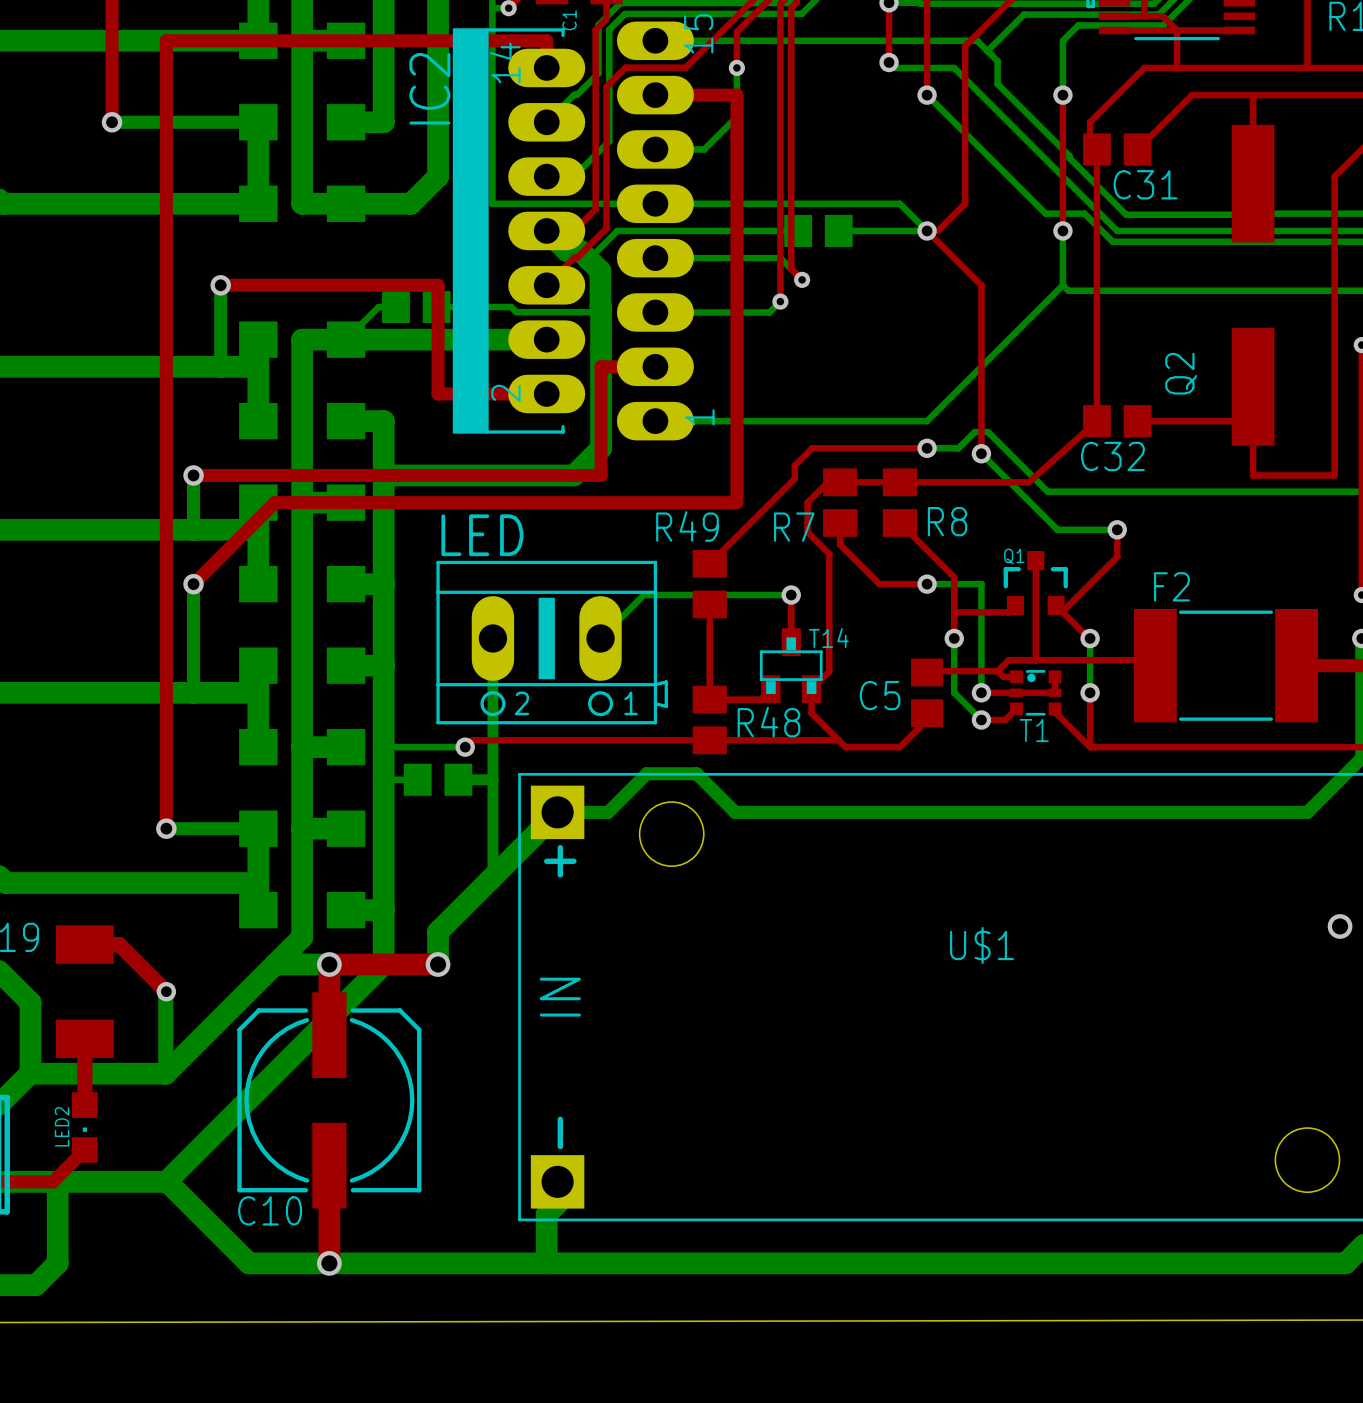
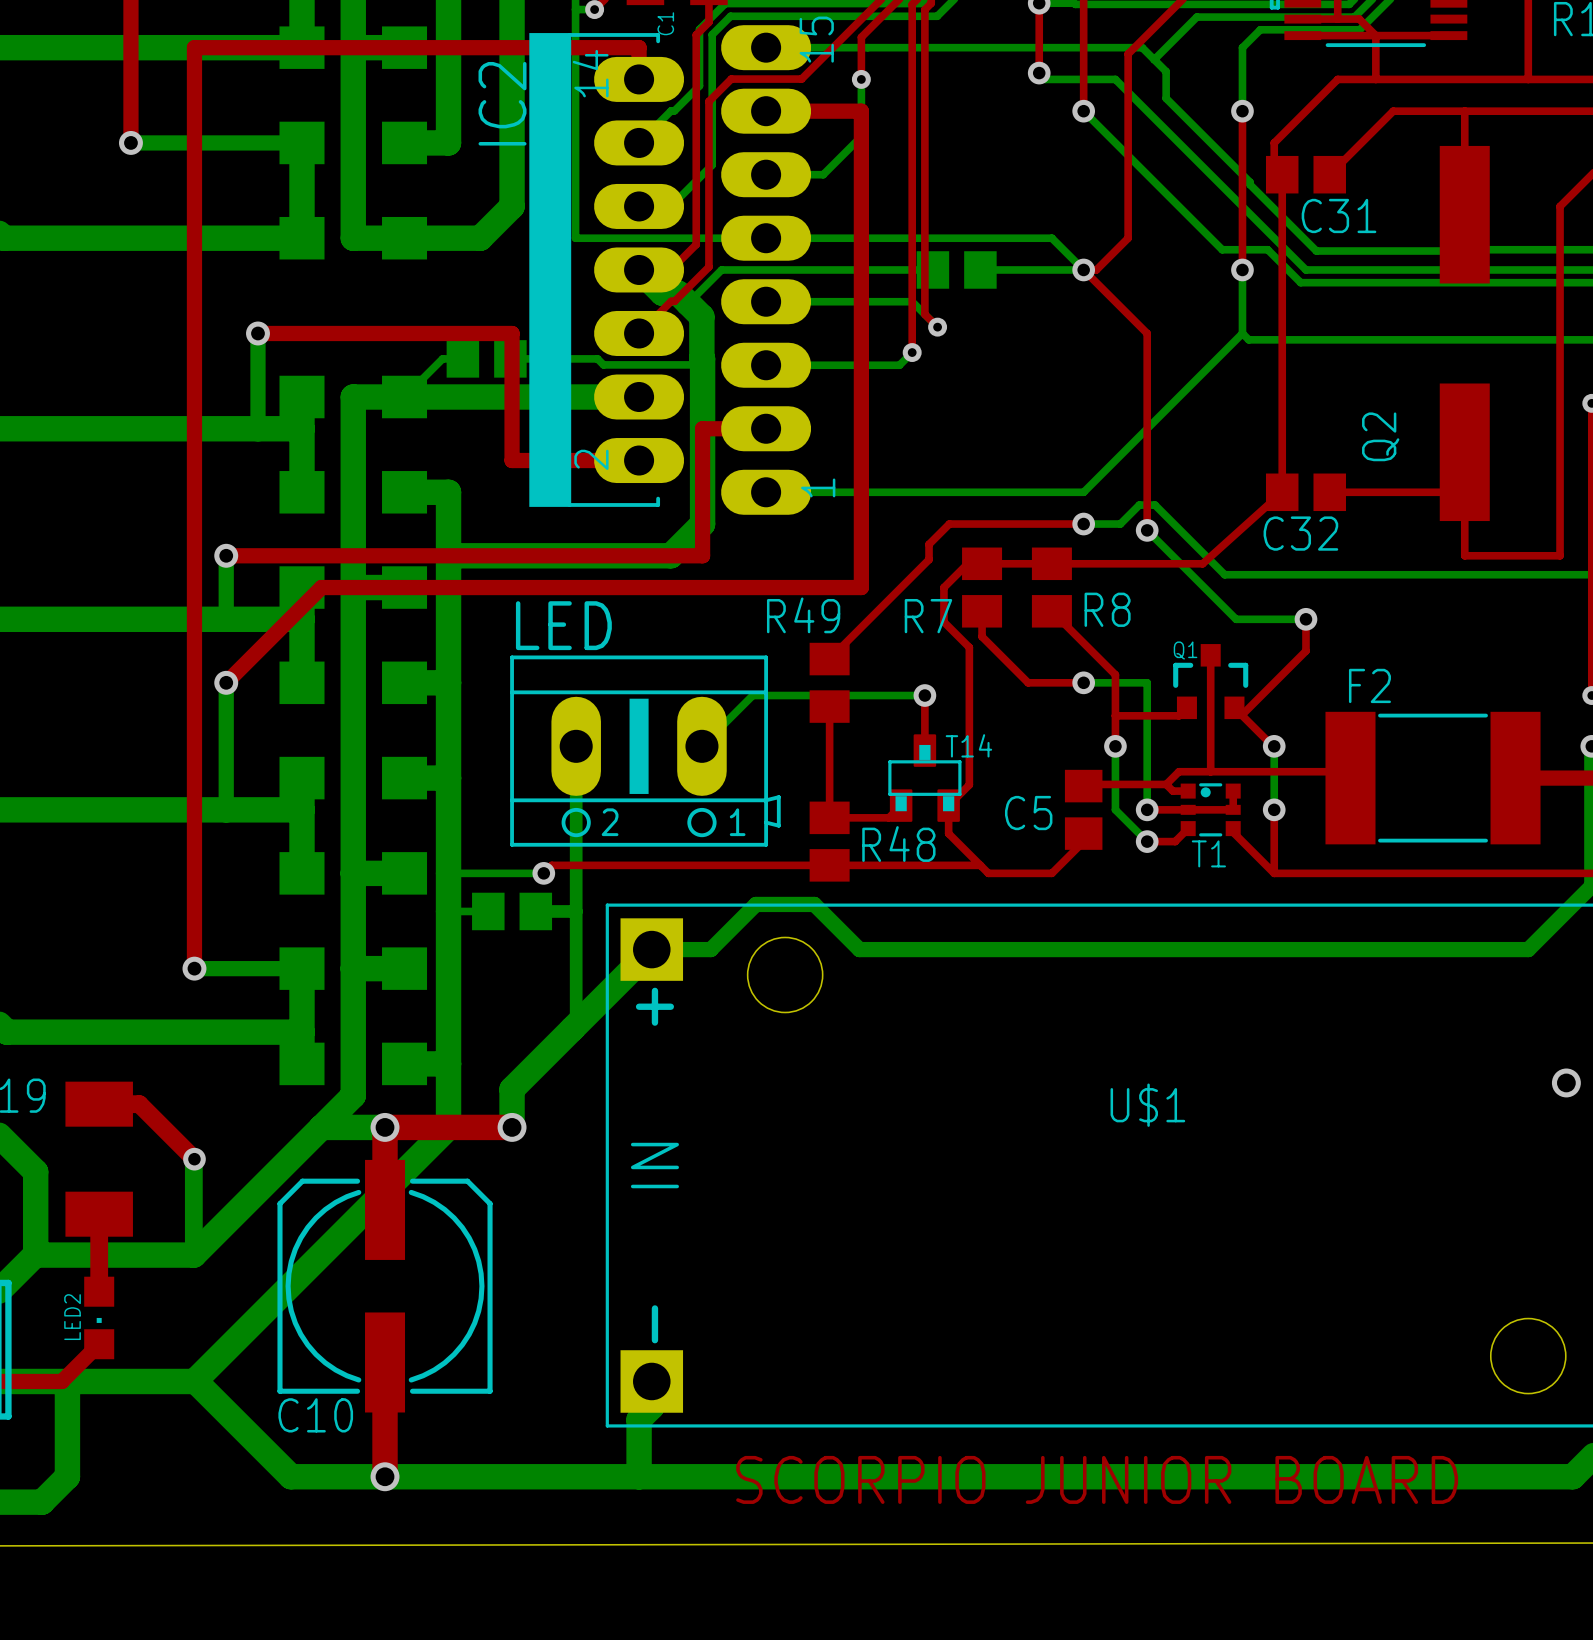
text: none -> SCORPIO JUNIOR BOARD (1097, 1479)

